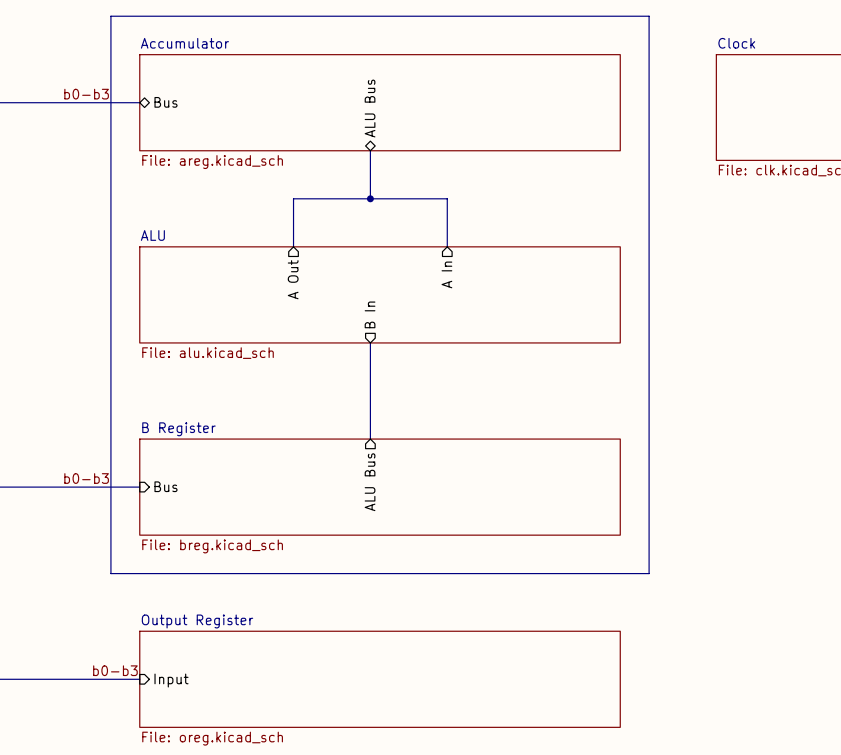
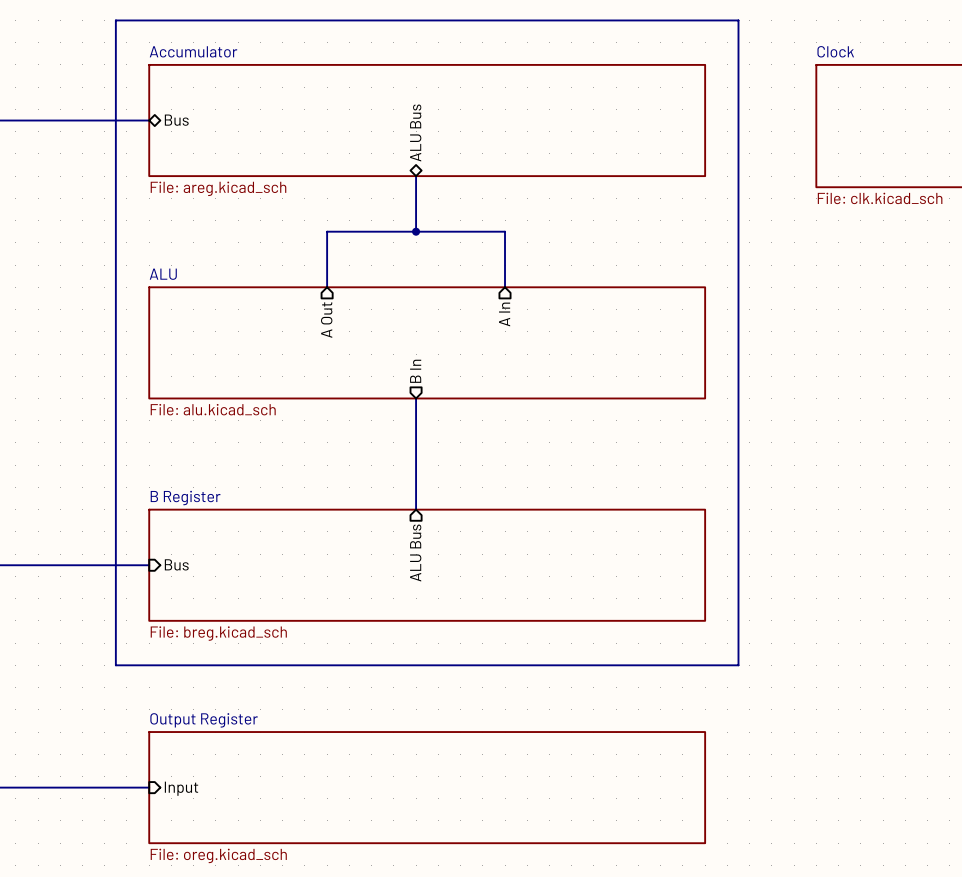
label: b0-b3 (86, 94) -> none
label: b0-b3 (86, 478) -> none
label: b0-b3 (115, 670) -> none

